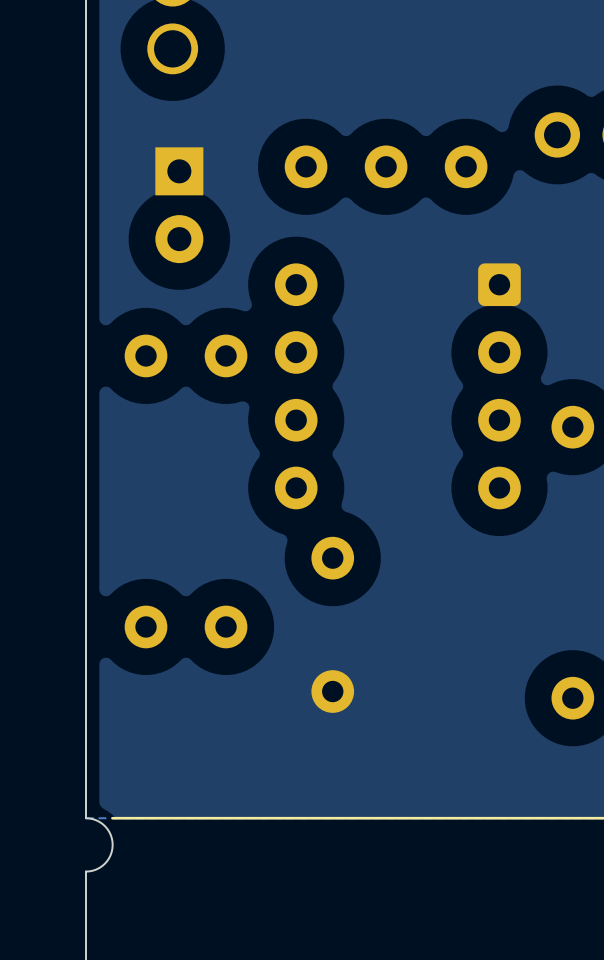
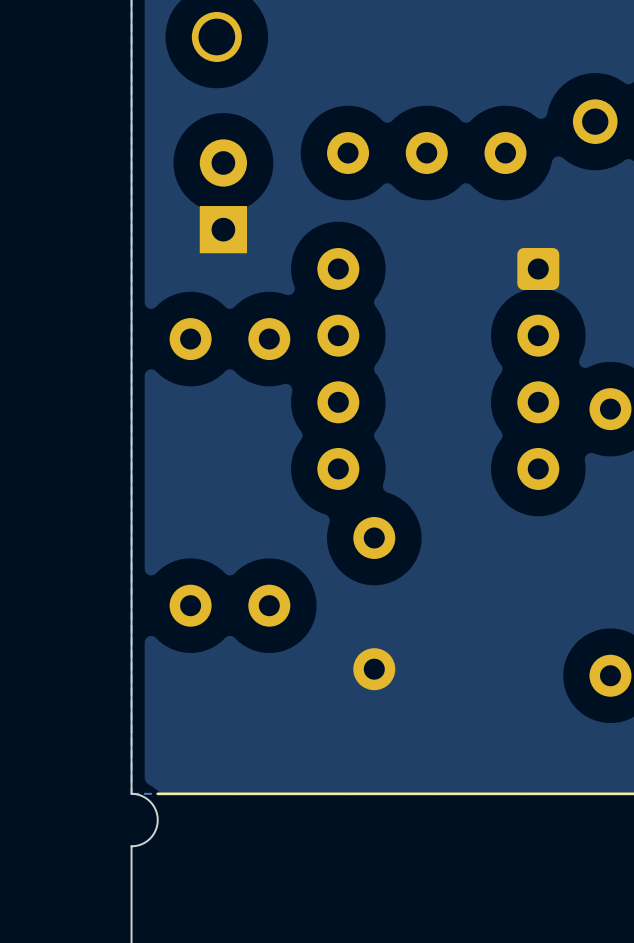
part rotation: 0° (179, 205) -> 180° (223, 196)

